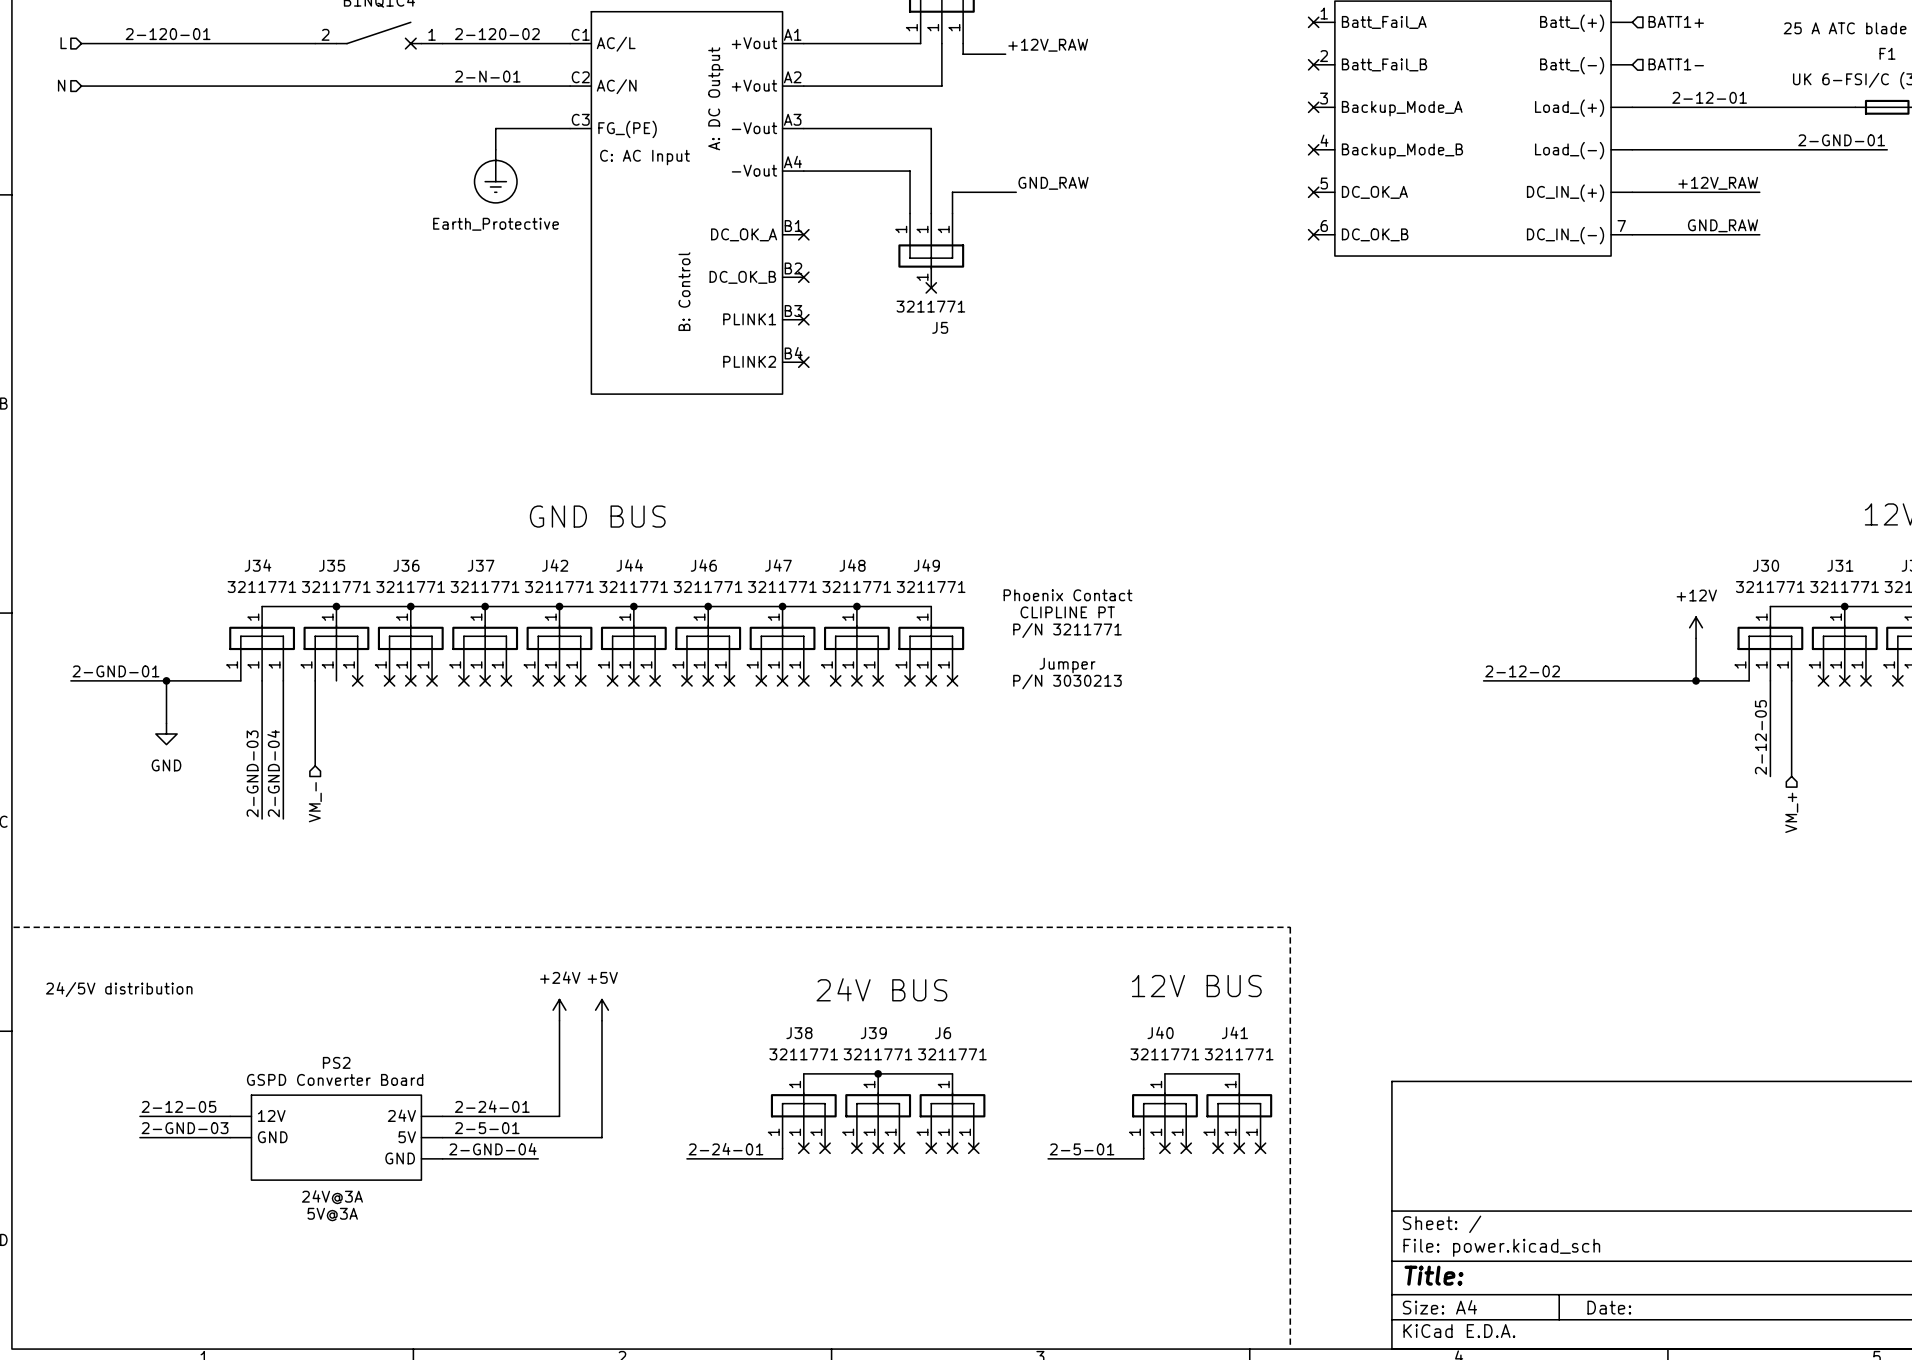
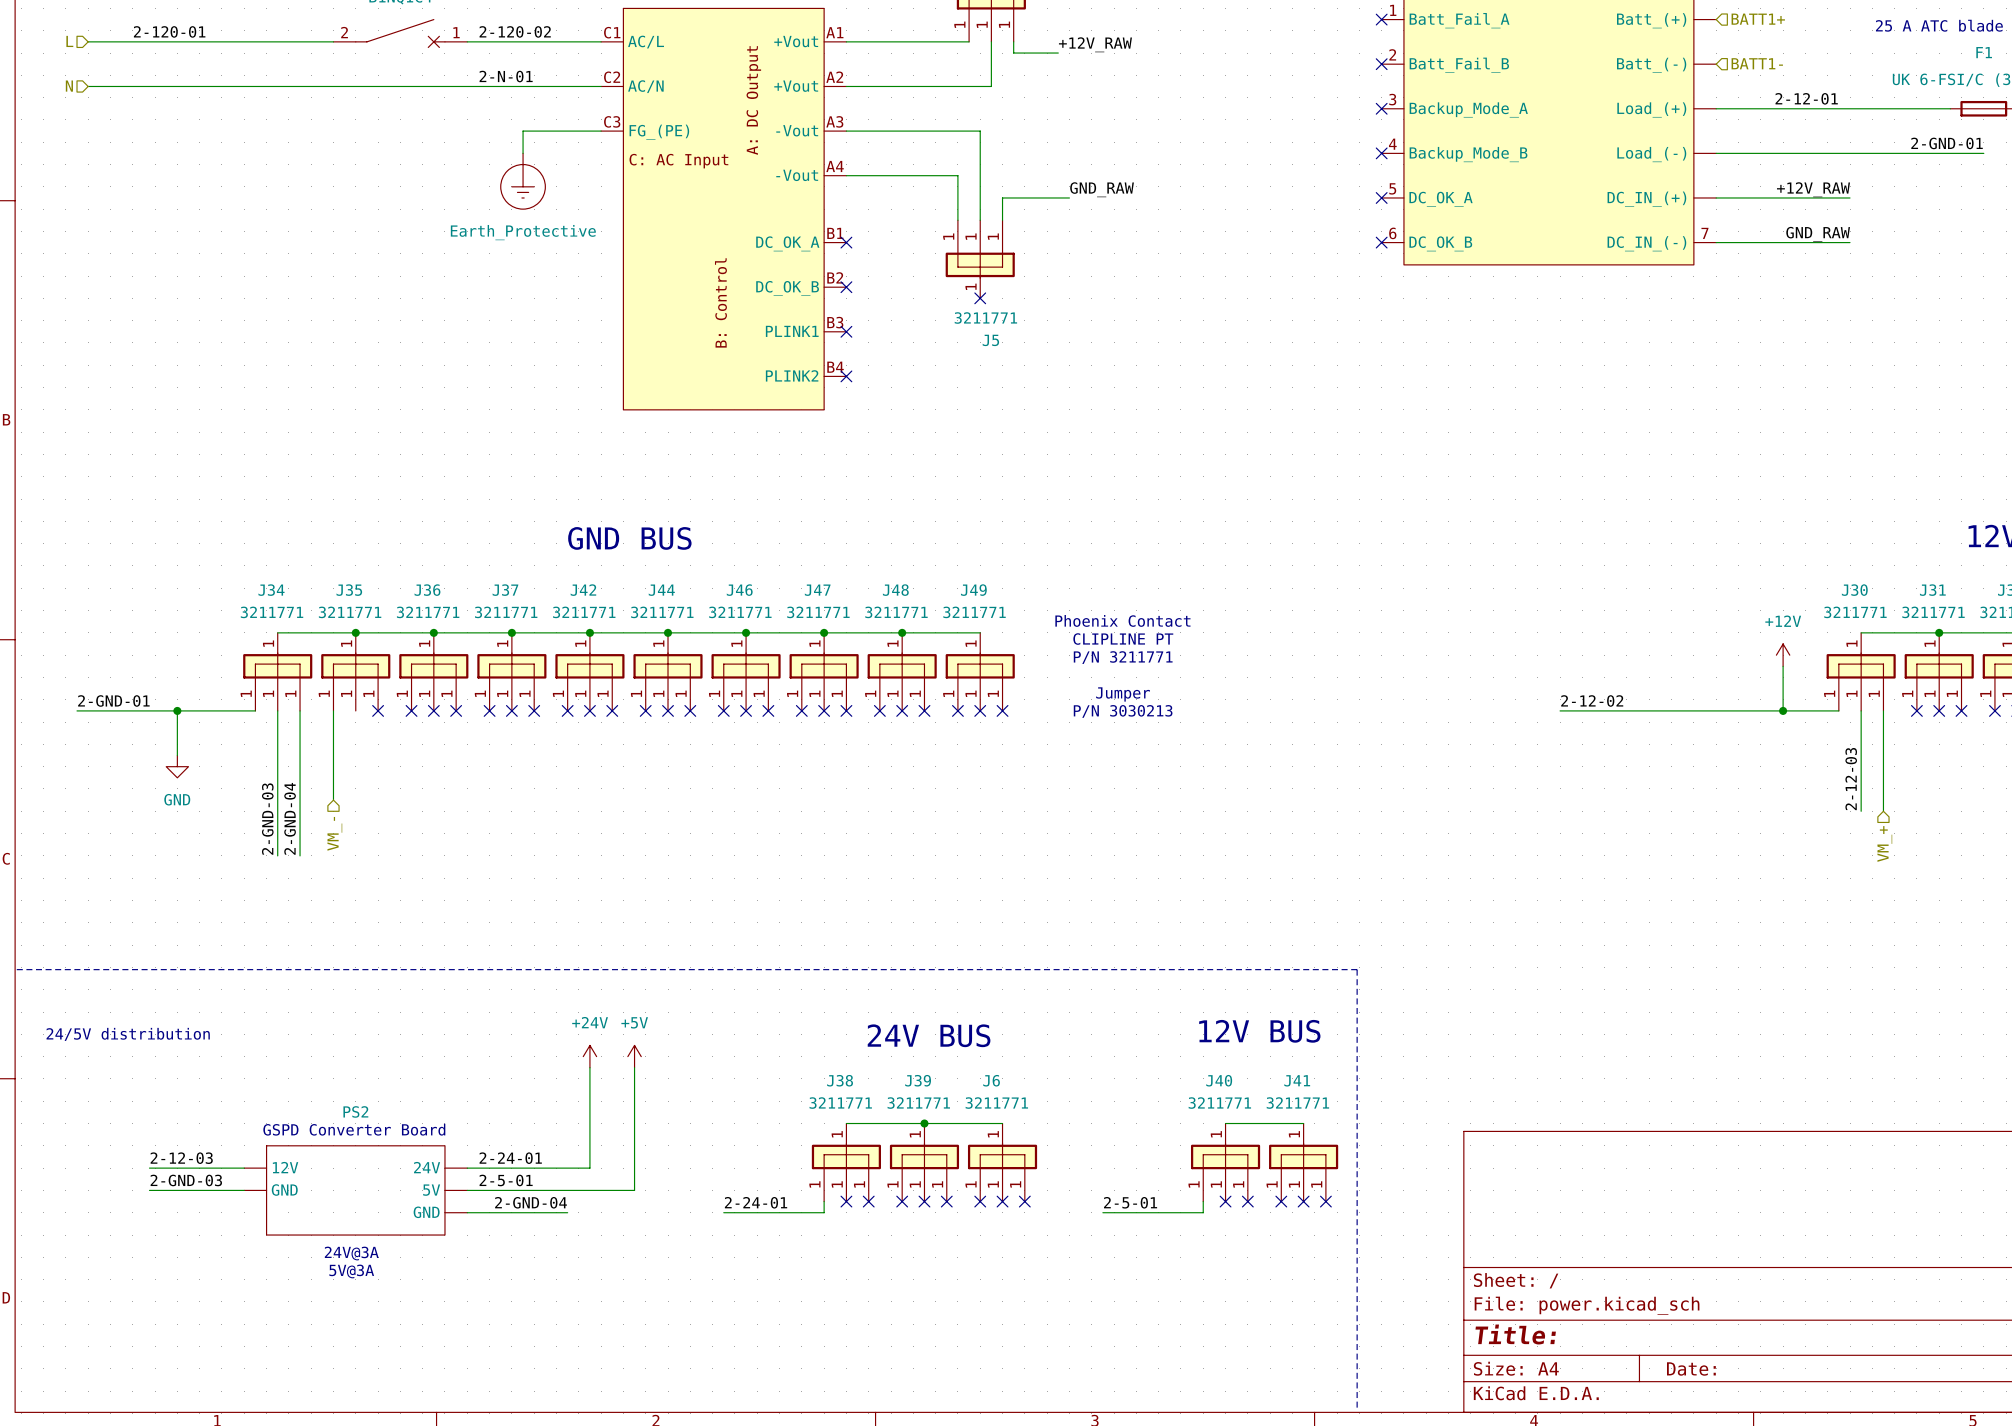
label: 2-12-05 (1760, 737) -> 2-12-03 (1851, 779)
label: 2-12-05 (178, 1106) -> 2-12-03 (181, 1158)

